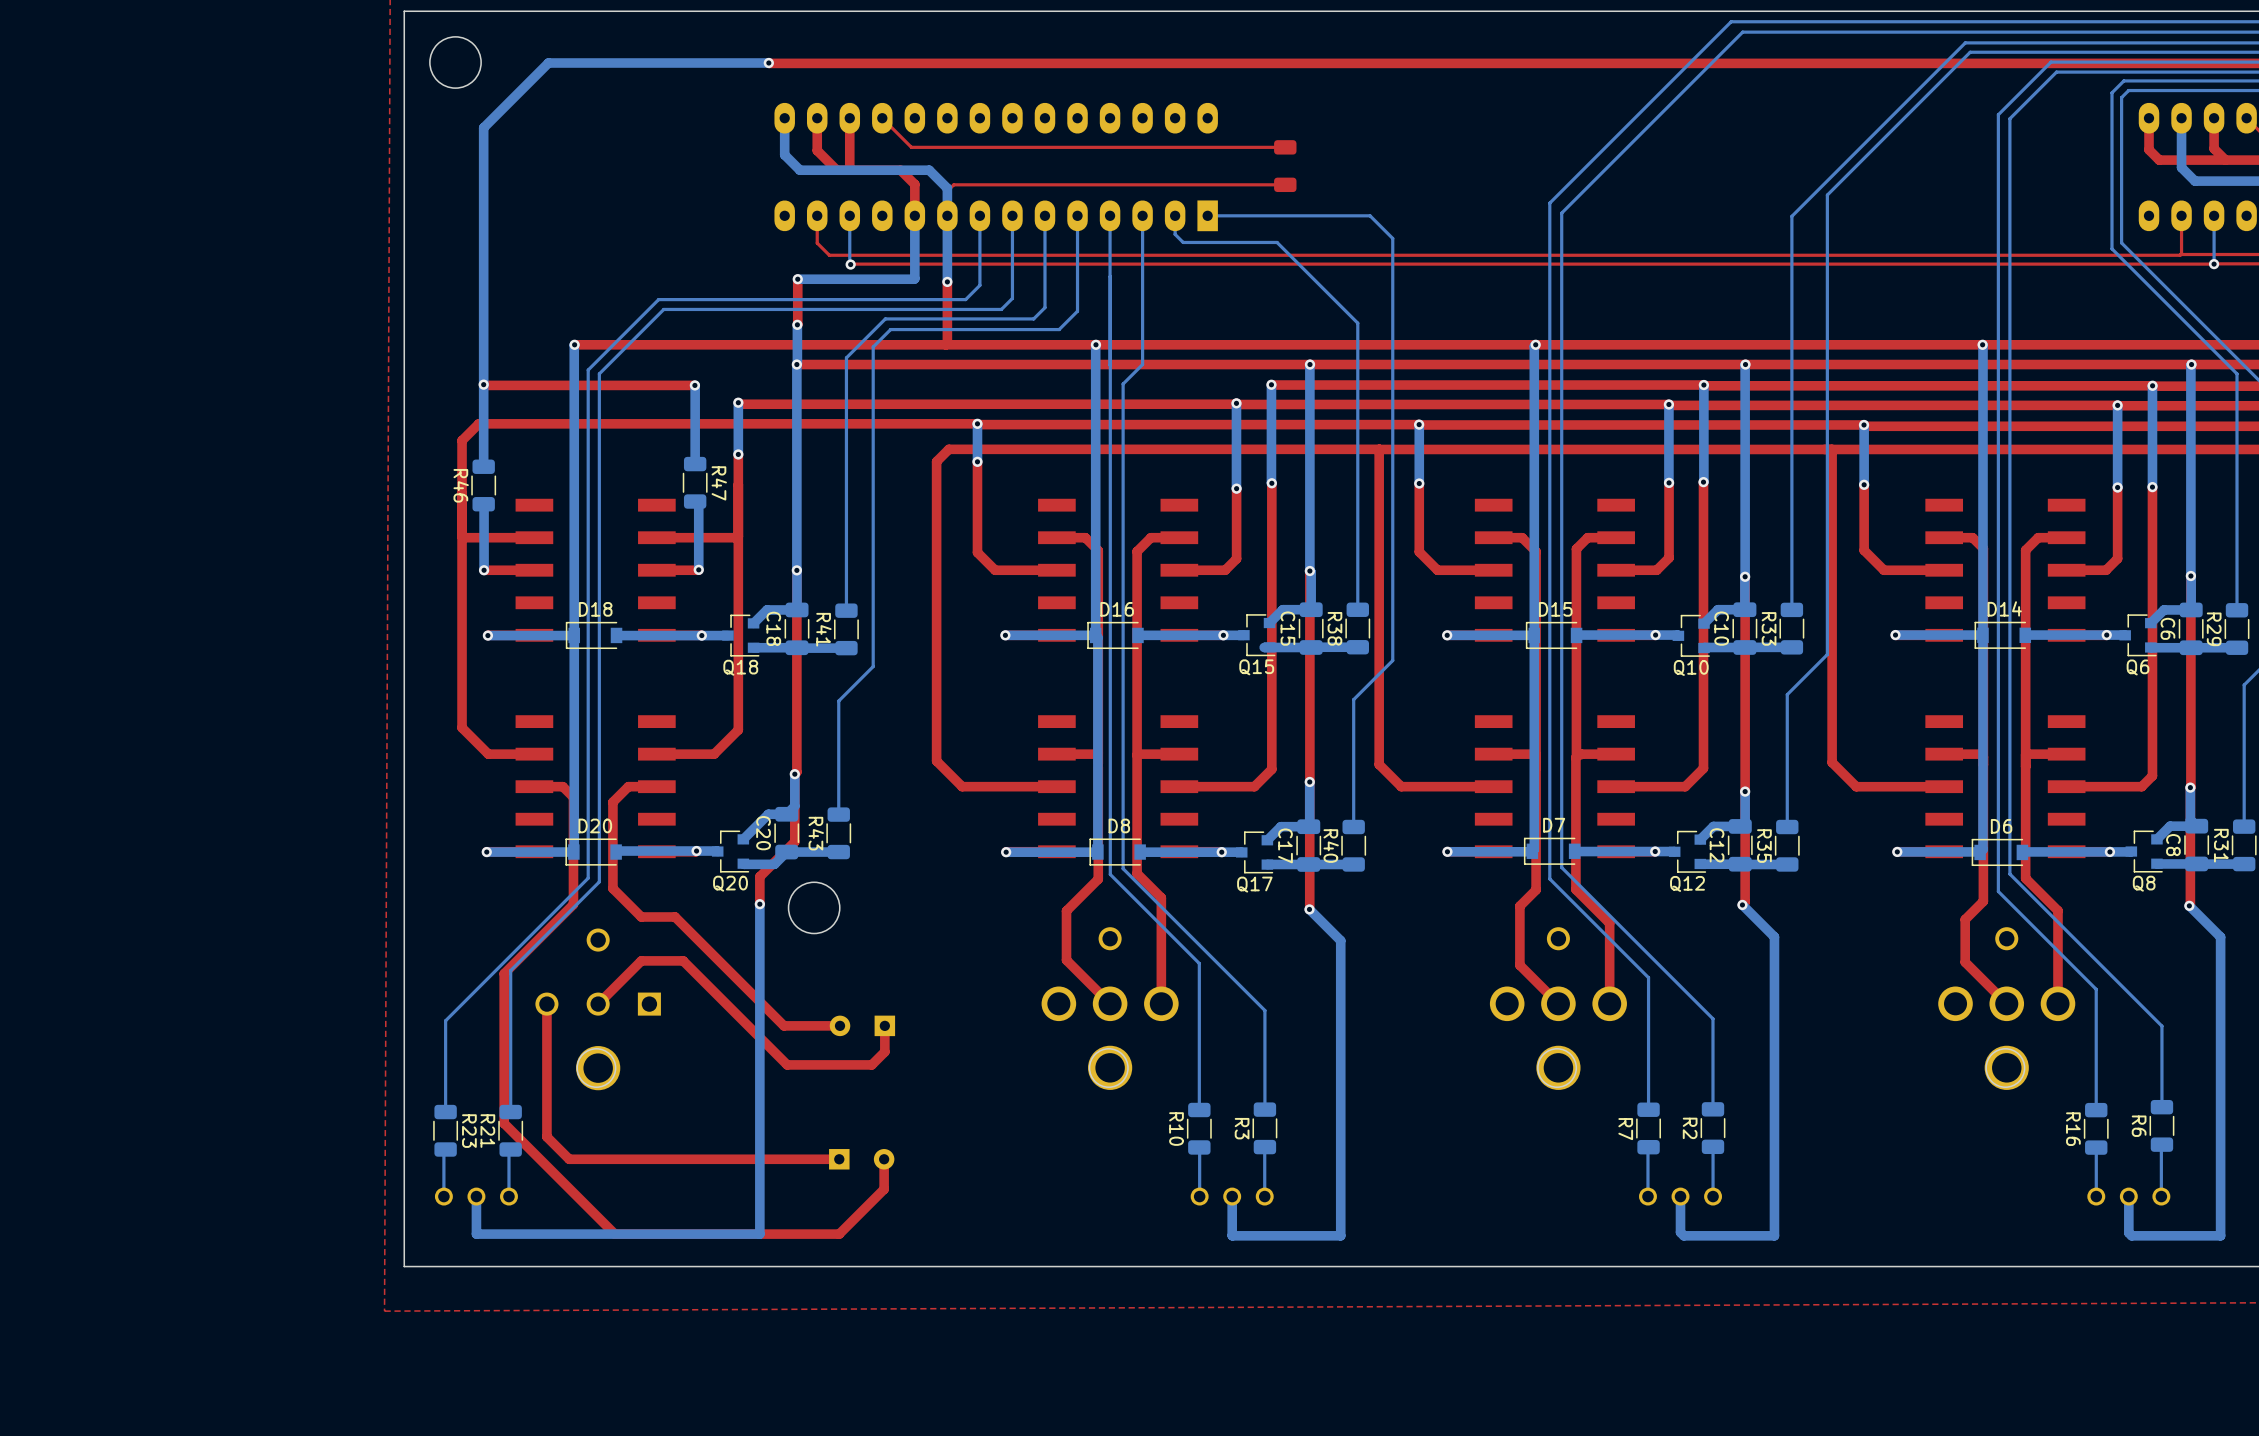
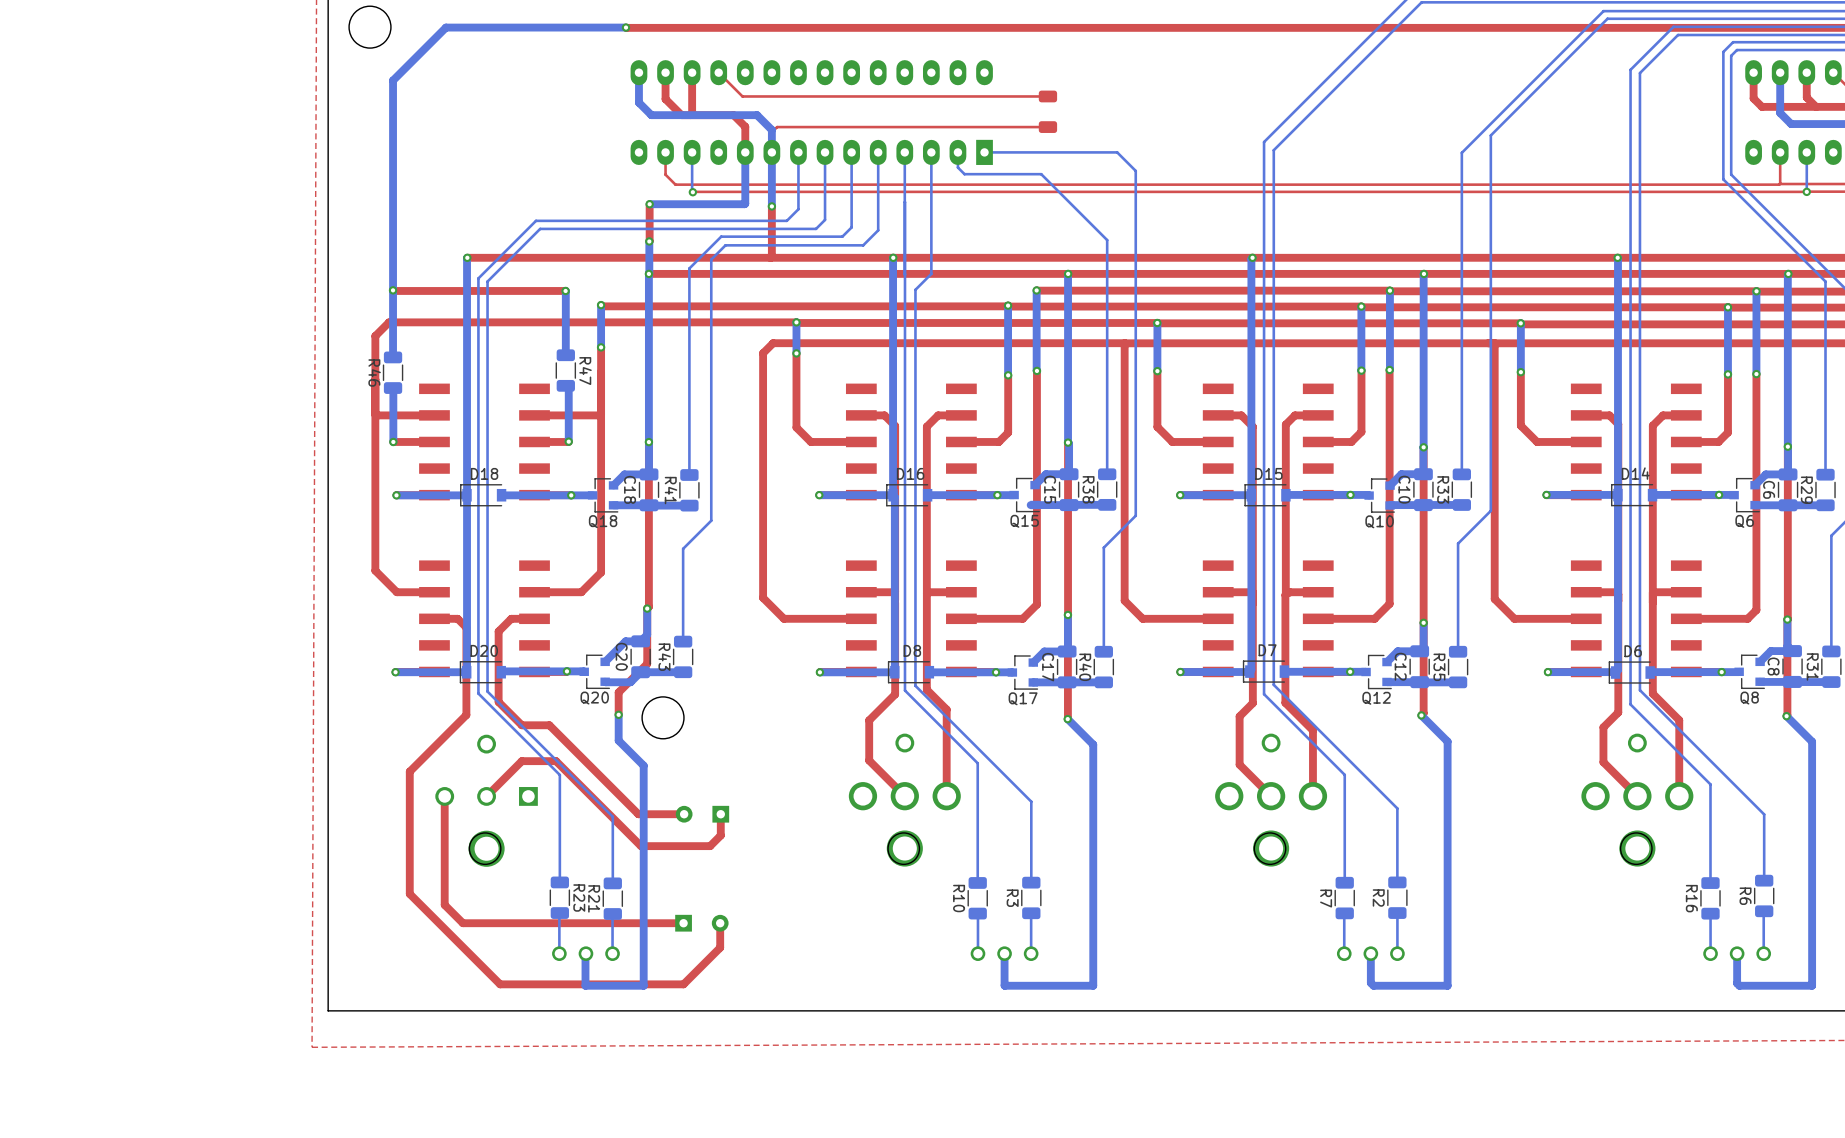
bottom track: (599, 875) (599, 881) (510, 970) (510, 1112) -> (487, 691) (612, 816) (612, 883)
bottom track: (588, 878) (445, 1020) (445, 1112) -> (478, 693) (559, 774) (559, 882)
bottom track: (759, 935) (759, 1234) (476, 1234) (476, 1196) -> (618, 740) (643, 765) (643, 985) (585, 985) (585, 953)
R23 position: (445, 1130) -> (559, 897)
R21 position: (510, 1130) -> (612, 898)
bottom track: none -> (559, 913) (559, 953)
bottom track: none -> (612, 913) (612, 953)
bottom track: (445, 1149) (443, 1151) (443, 1196) -> none
bottom track: (510, 1149) (508, 1151) (508, 1196) -> none
part position: (476, 1196) -> (585, 953)

